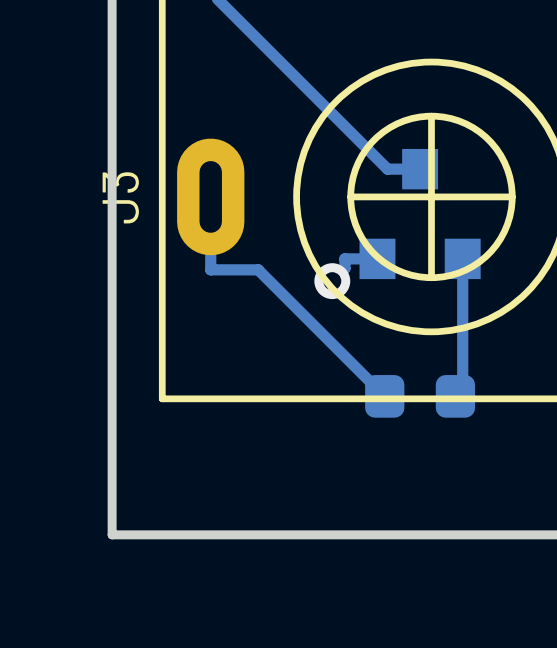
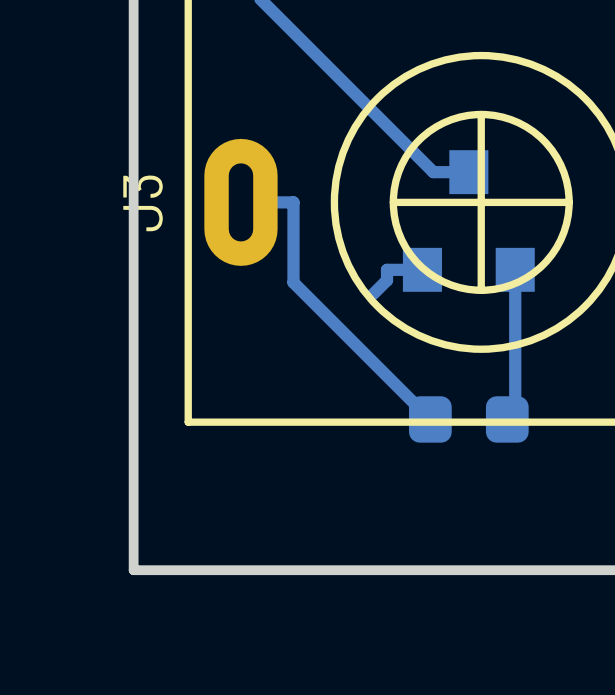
bottom track: (210, 196) (210, 269) (258, 270) -> (240, 202) (293, 202) (293, 282)
via: (332, 281) -> none

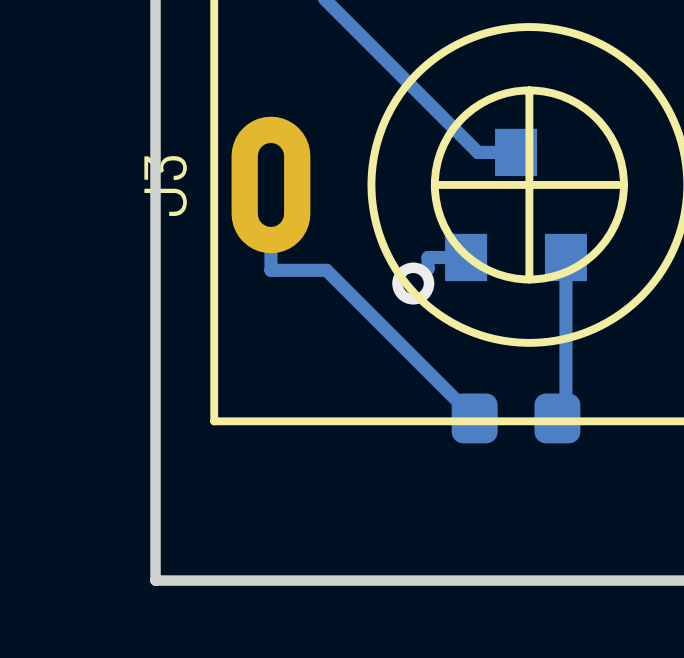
bottom track: (240, 202) (293, 202) (293, 282) -> (270, 184) (270, 270) (327, 271)
via: none -> (413, 283)

